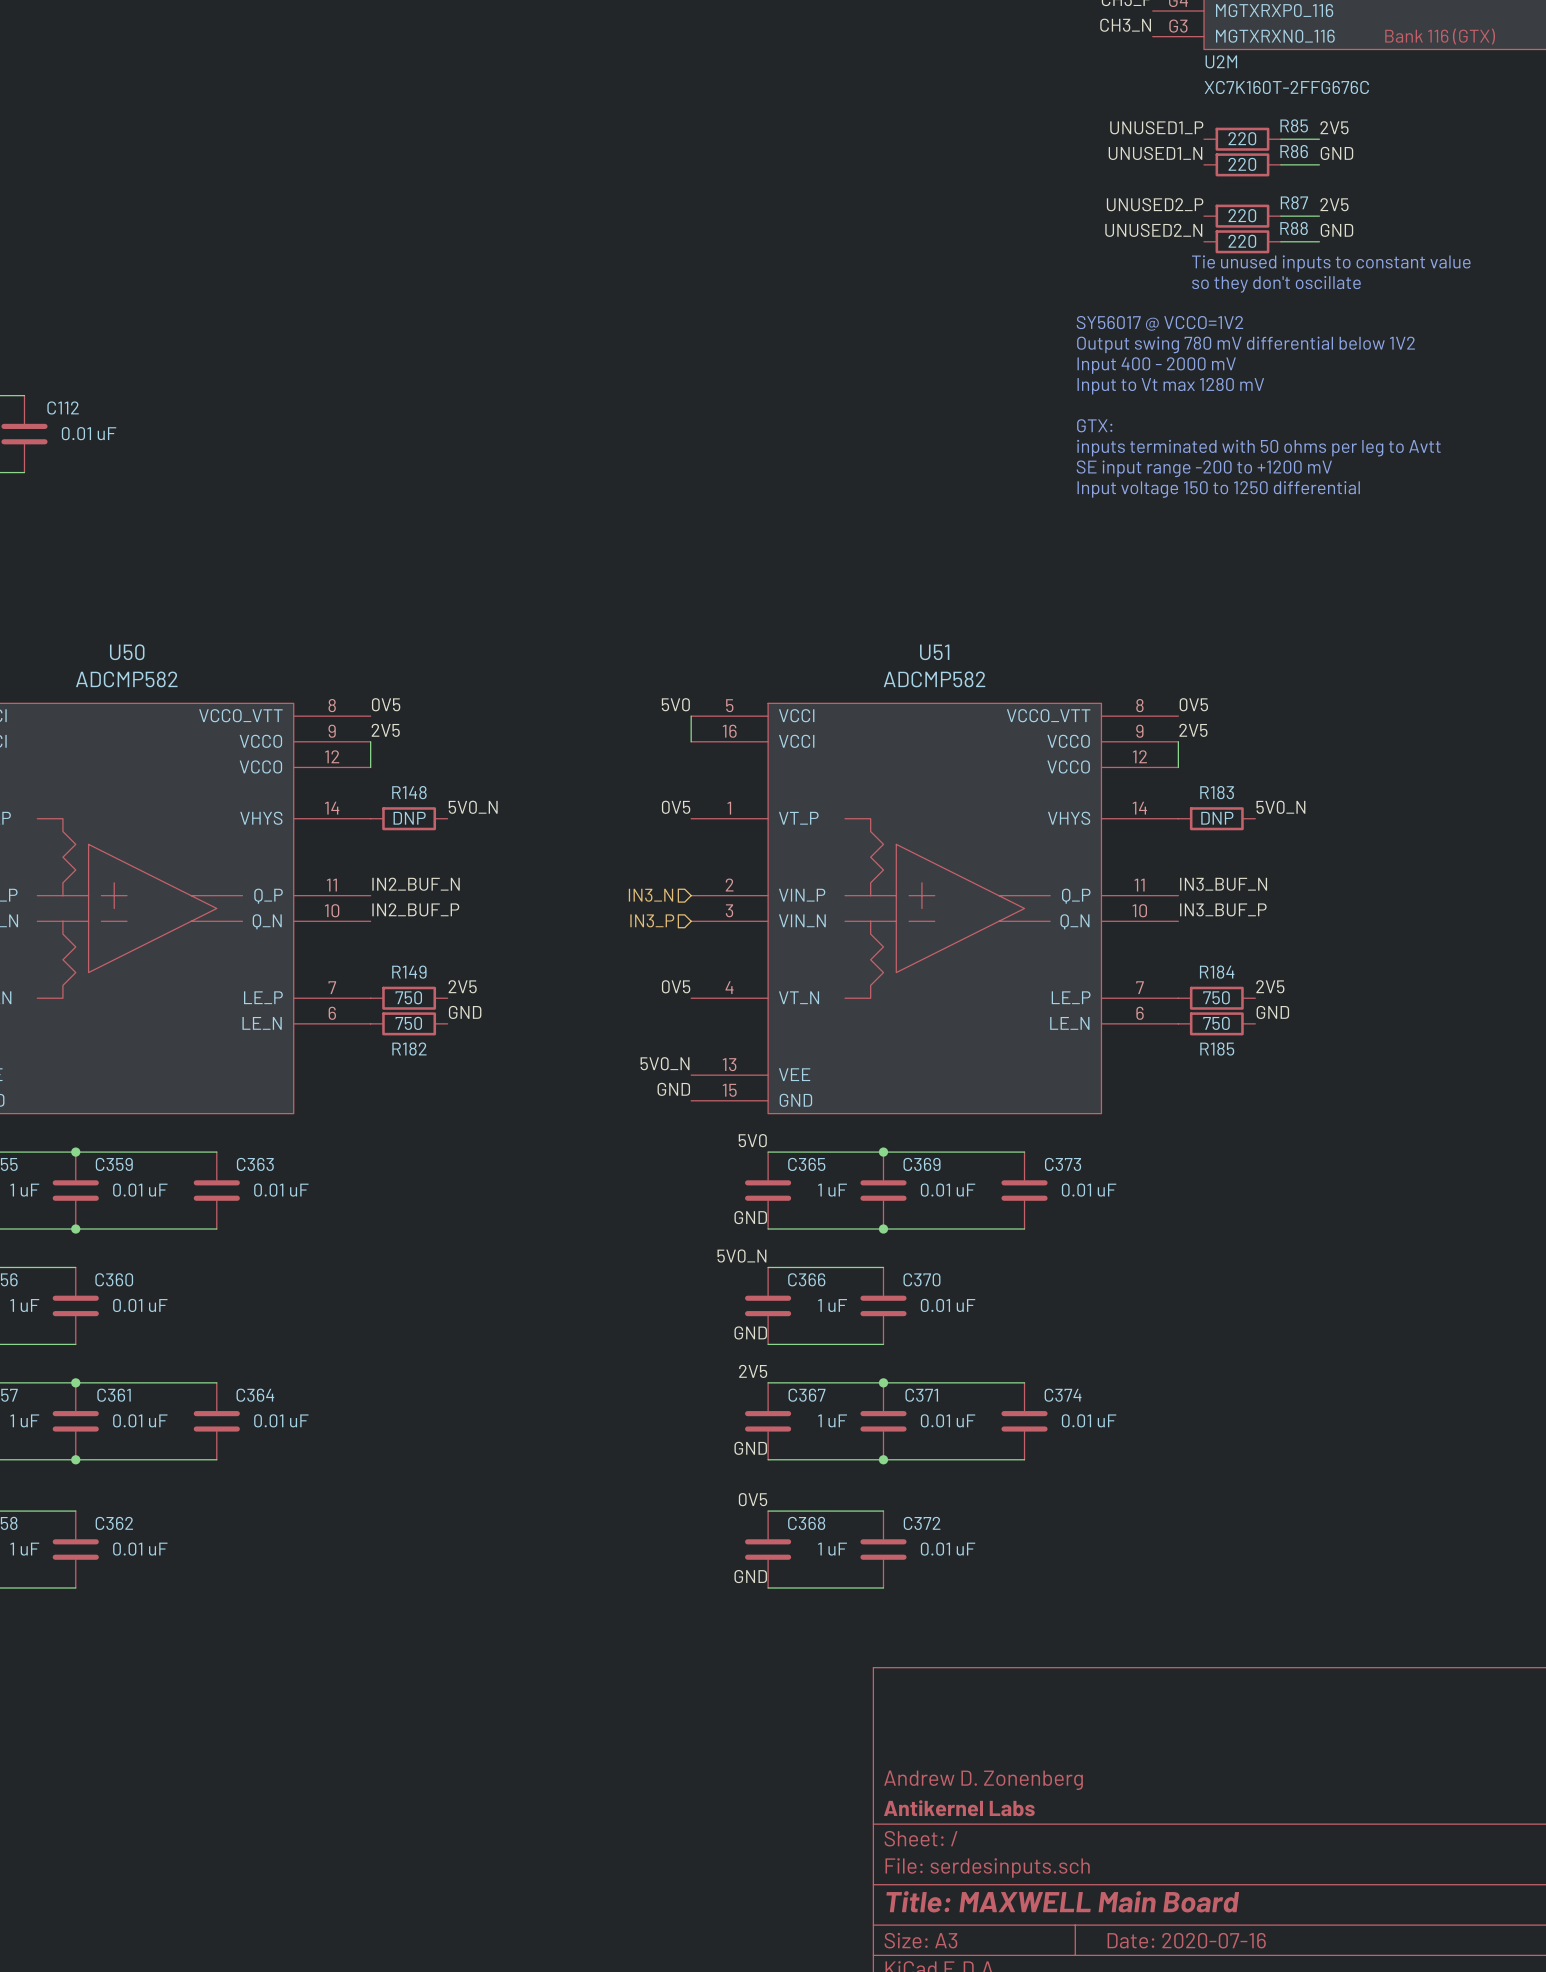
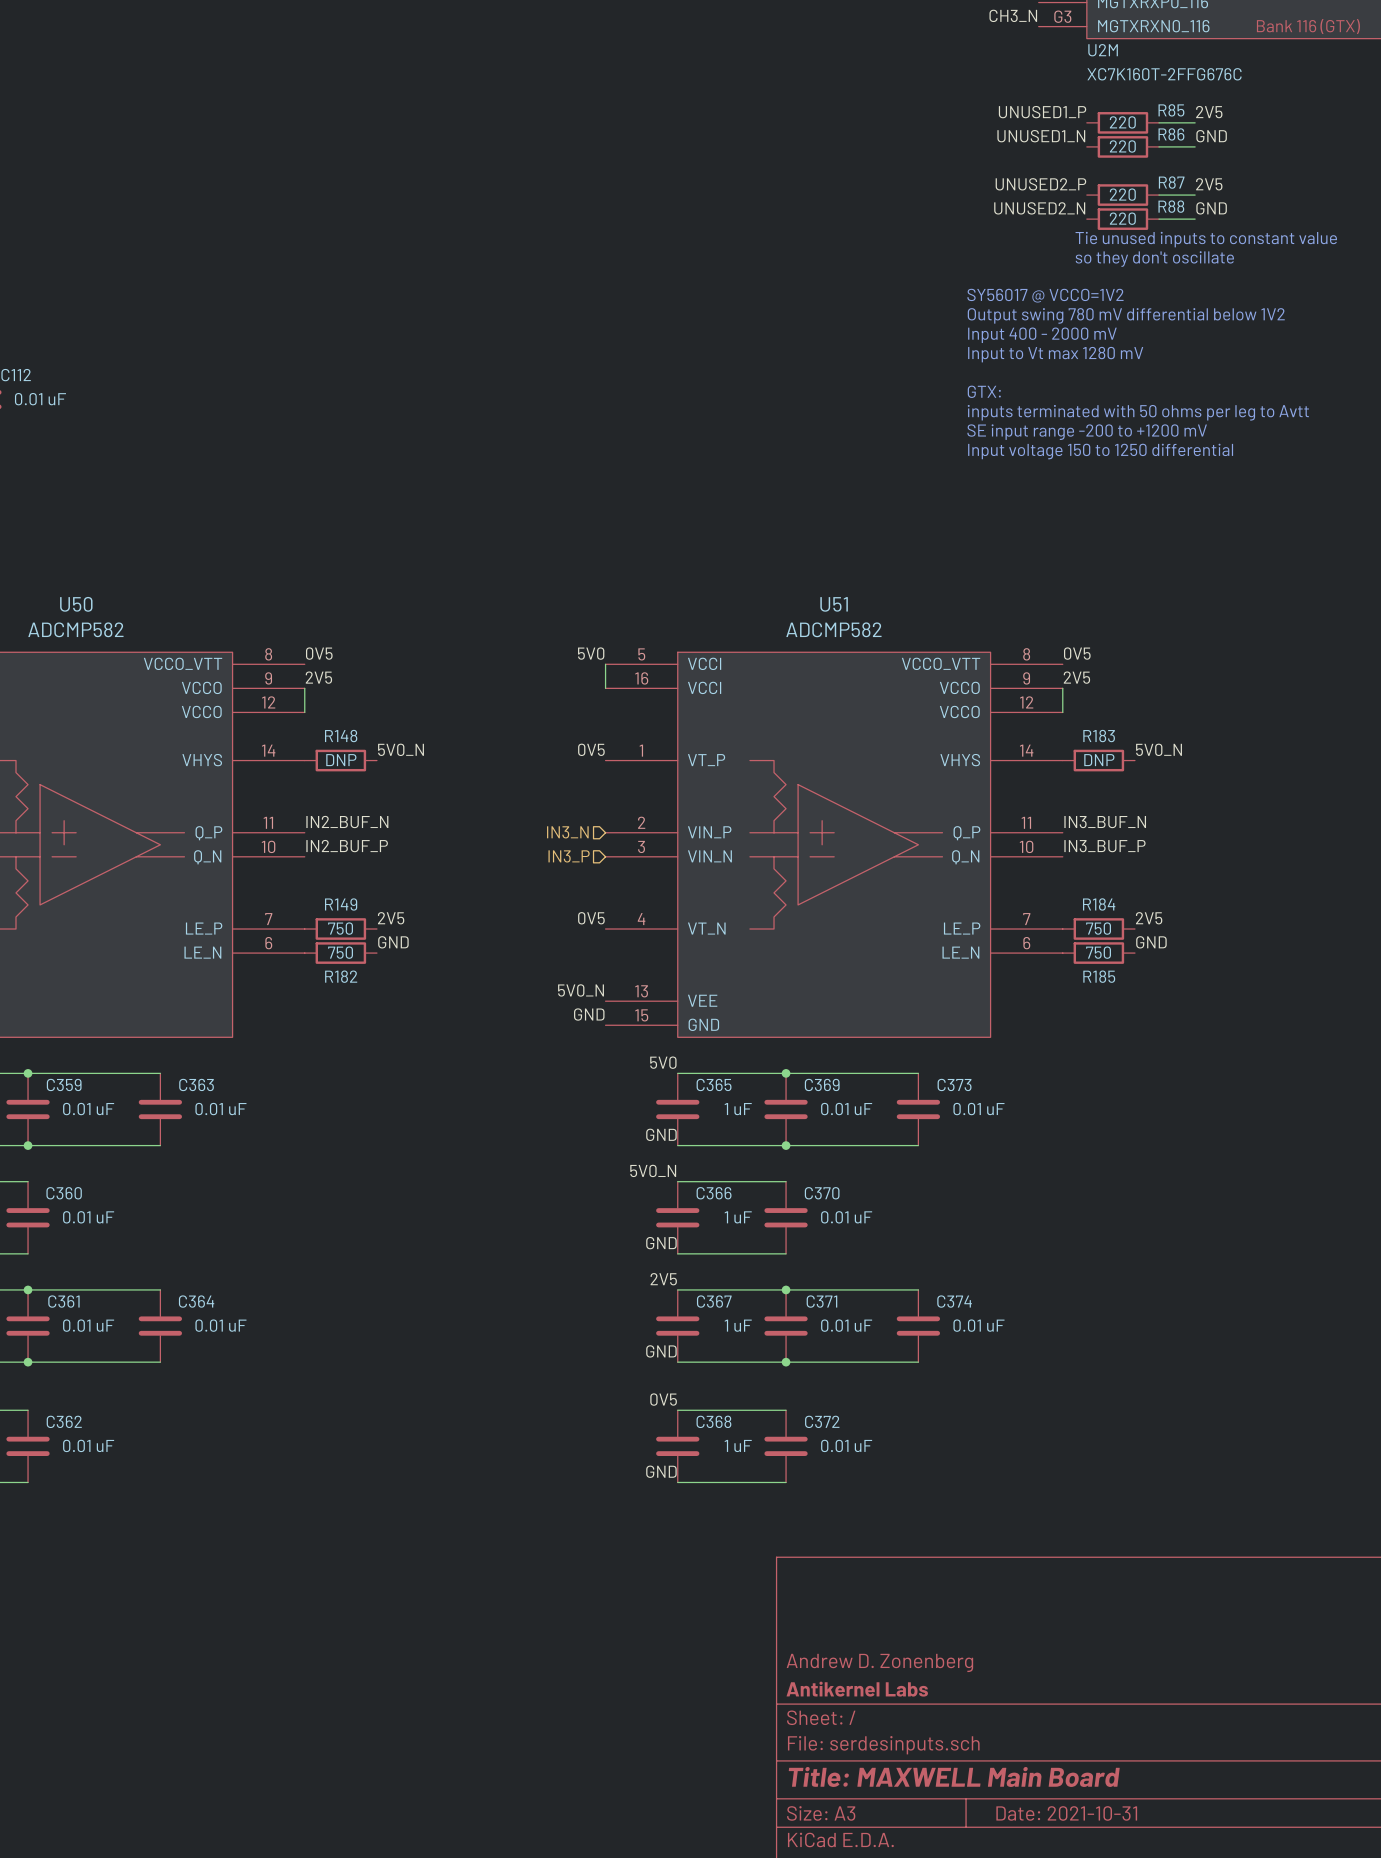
title block: Date: 2020-07-16 (1186, 1940) -> Date: 2021-10-31 (1066, 1813)

